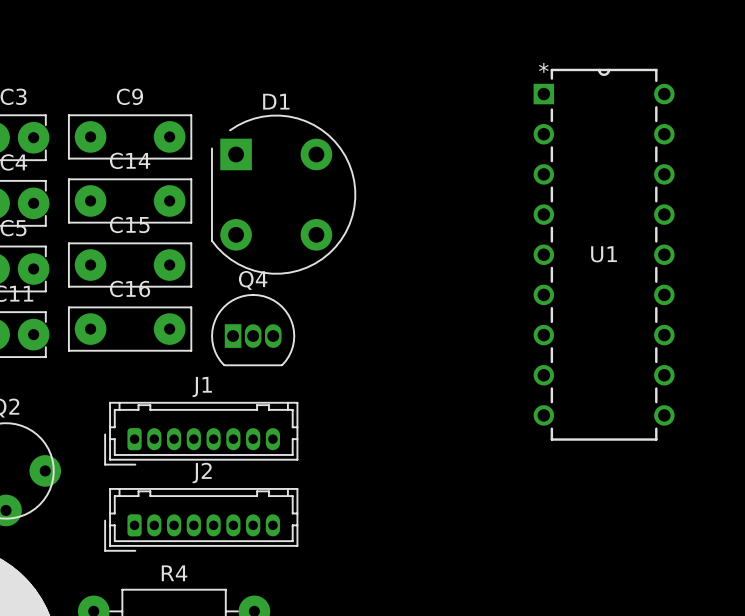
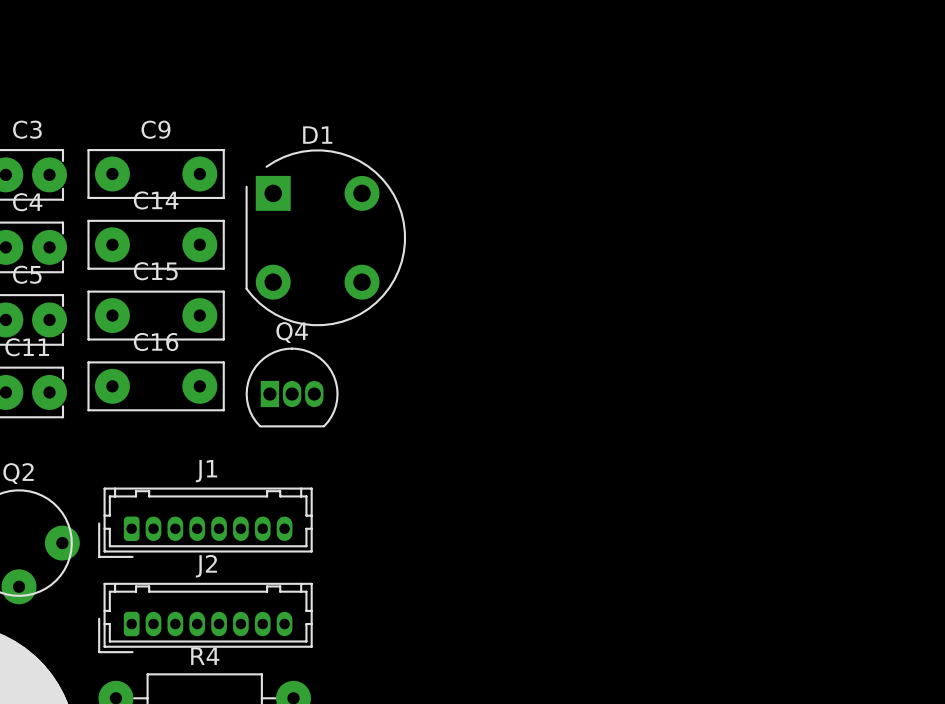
U1: (604, 254) -> none
J1 position: (201, 433) -> (205, 522)
J2 position: (201, 519) -> (205, 617)

